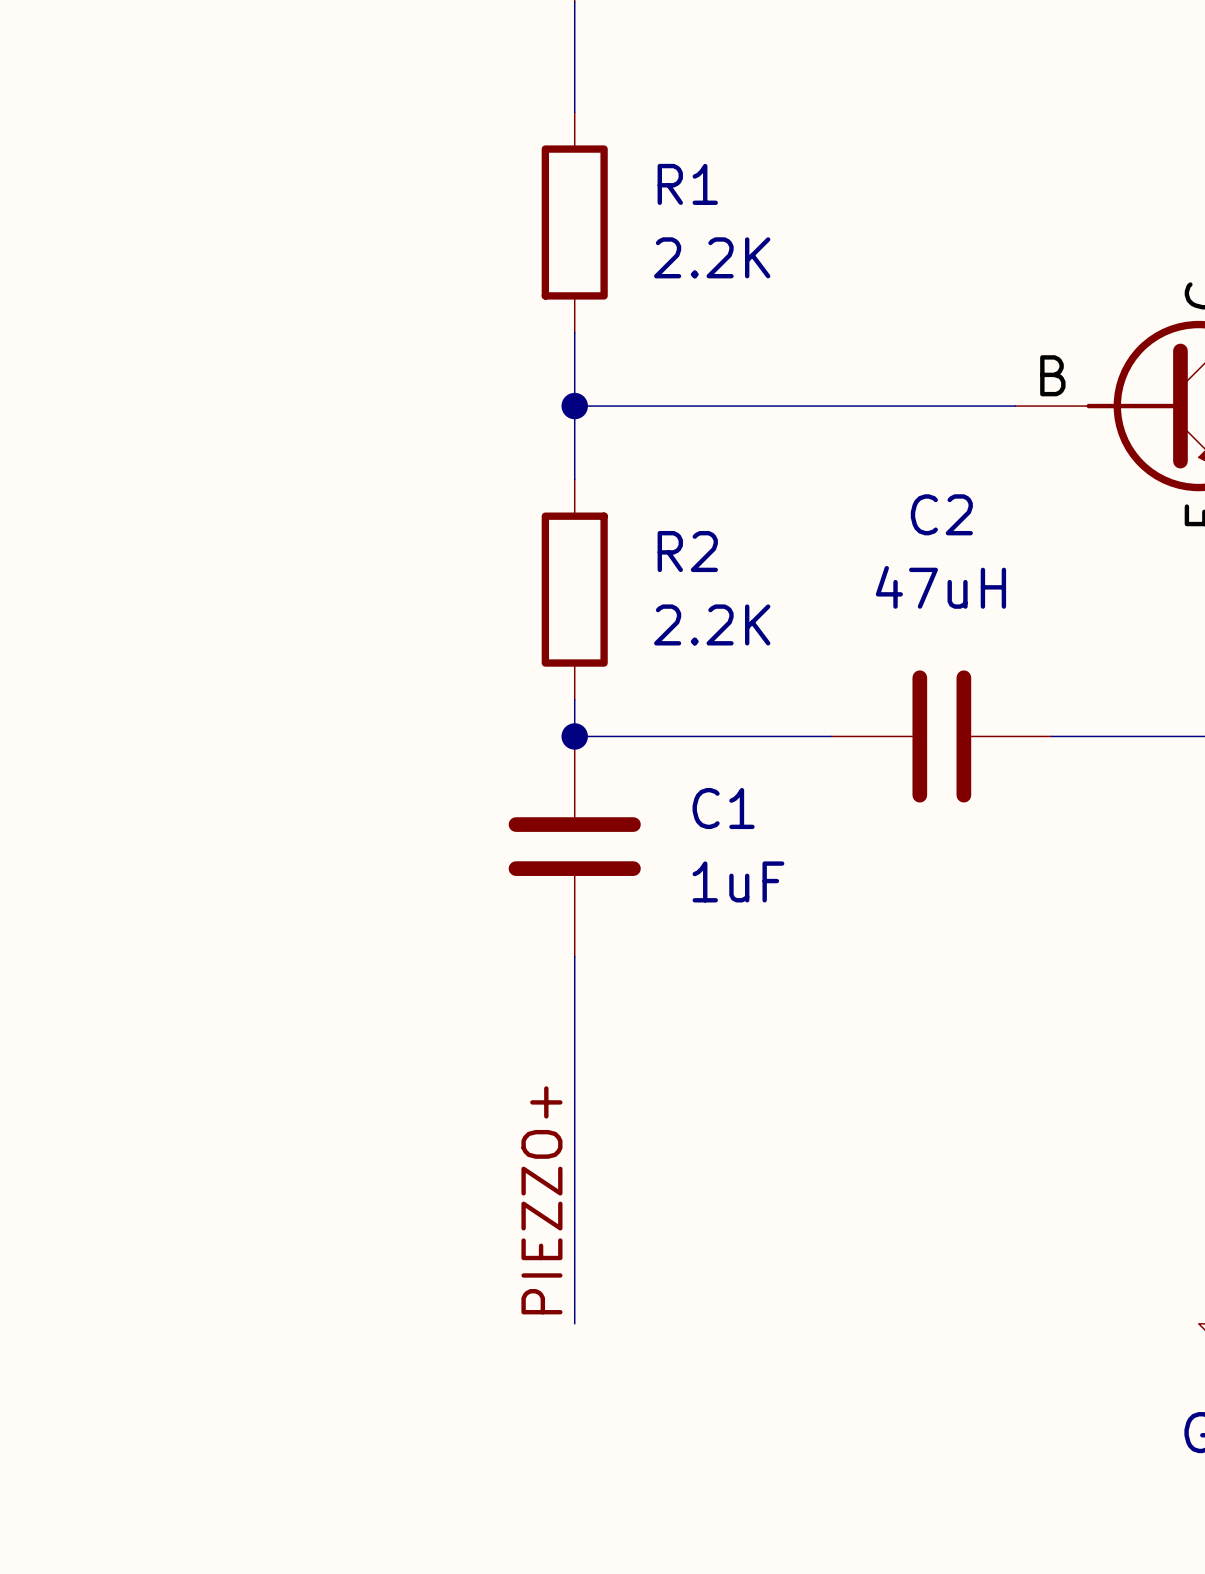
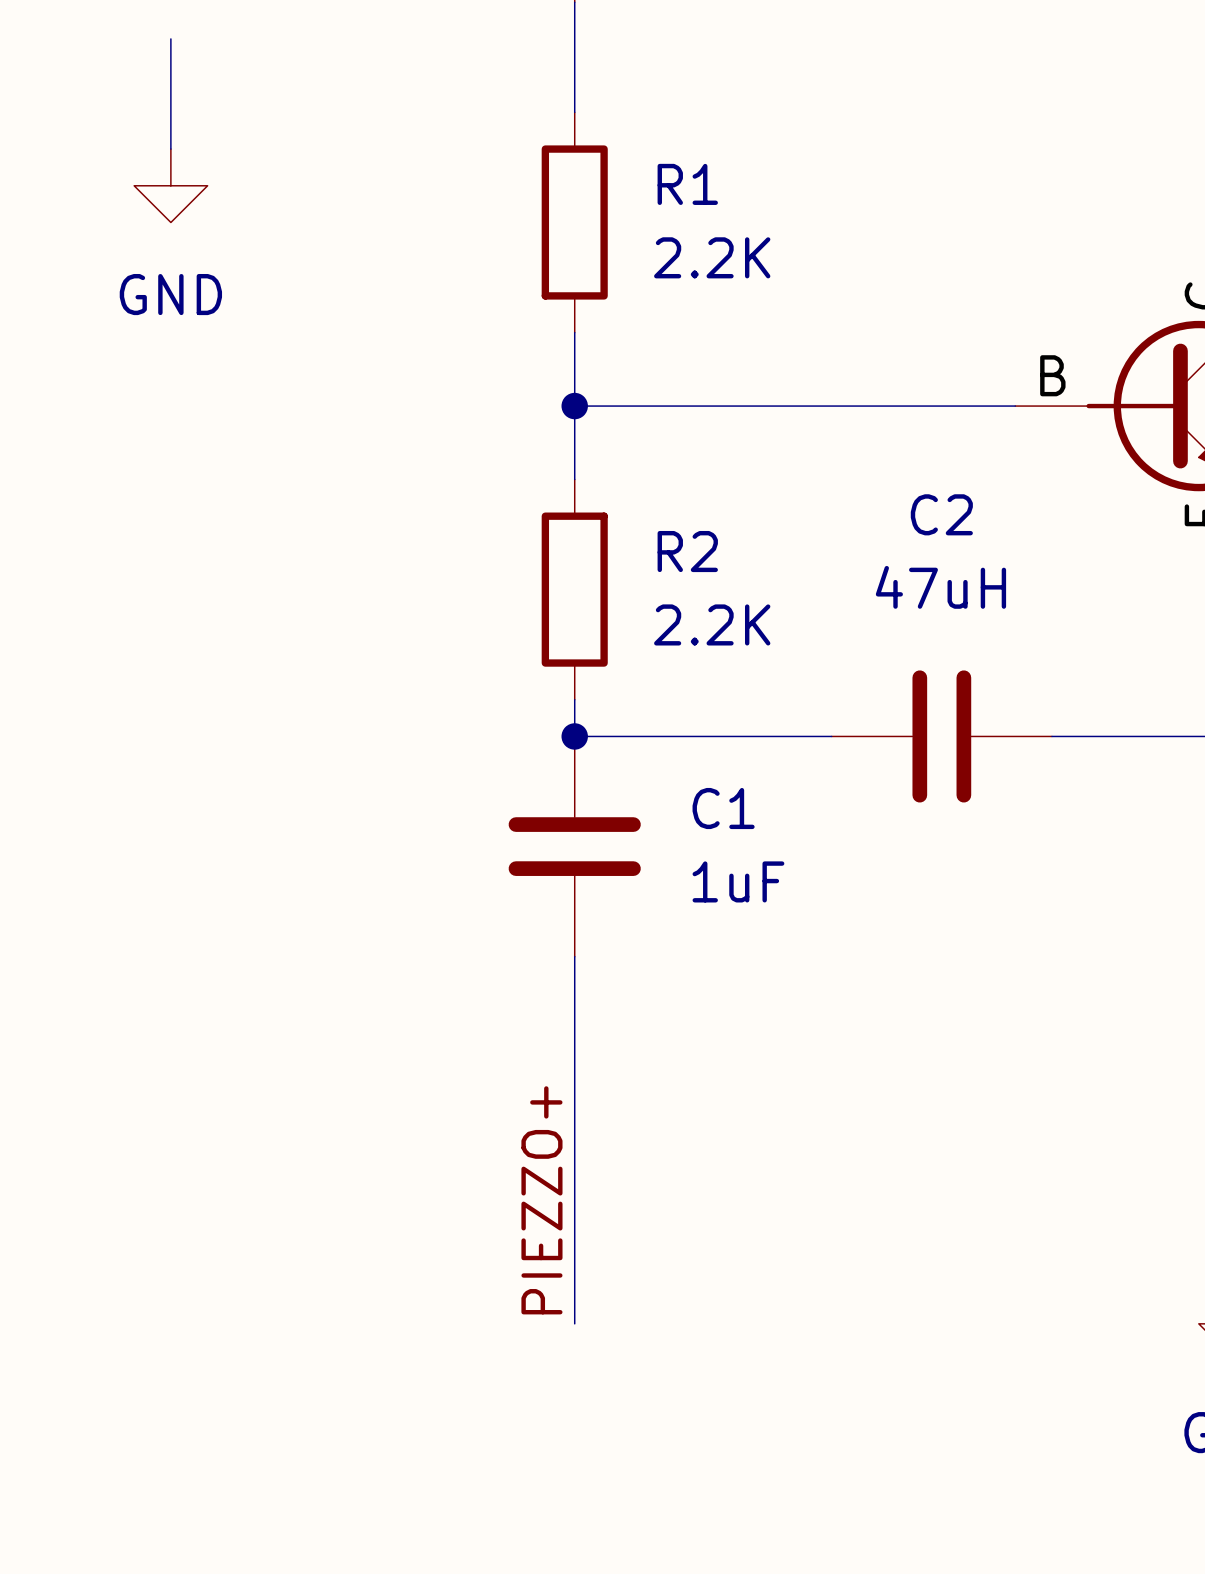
wire: none -> (170, 38) (170, 149)
power symbol: none -> GND (170, 185)

